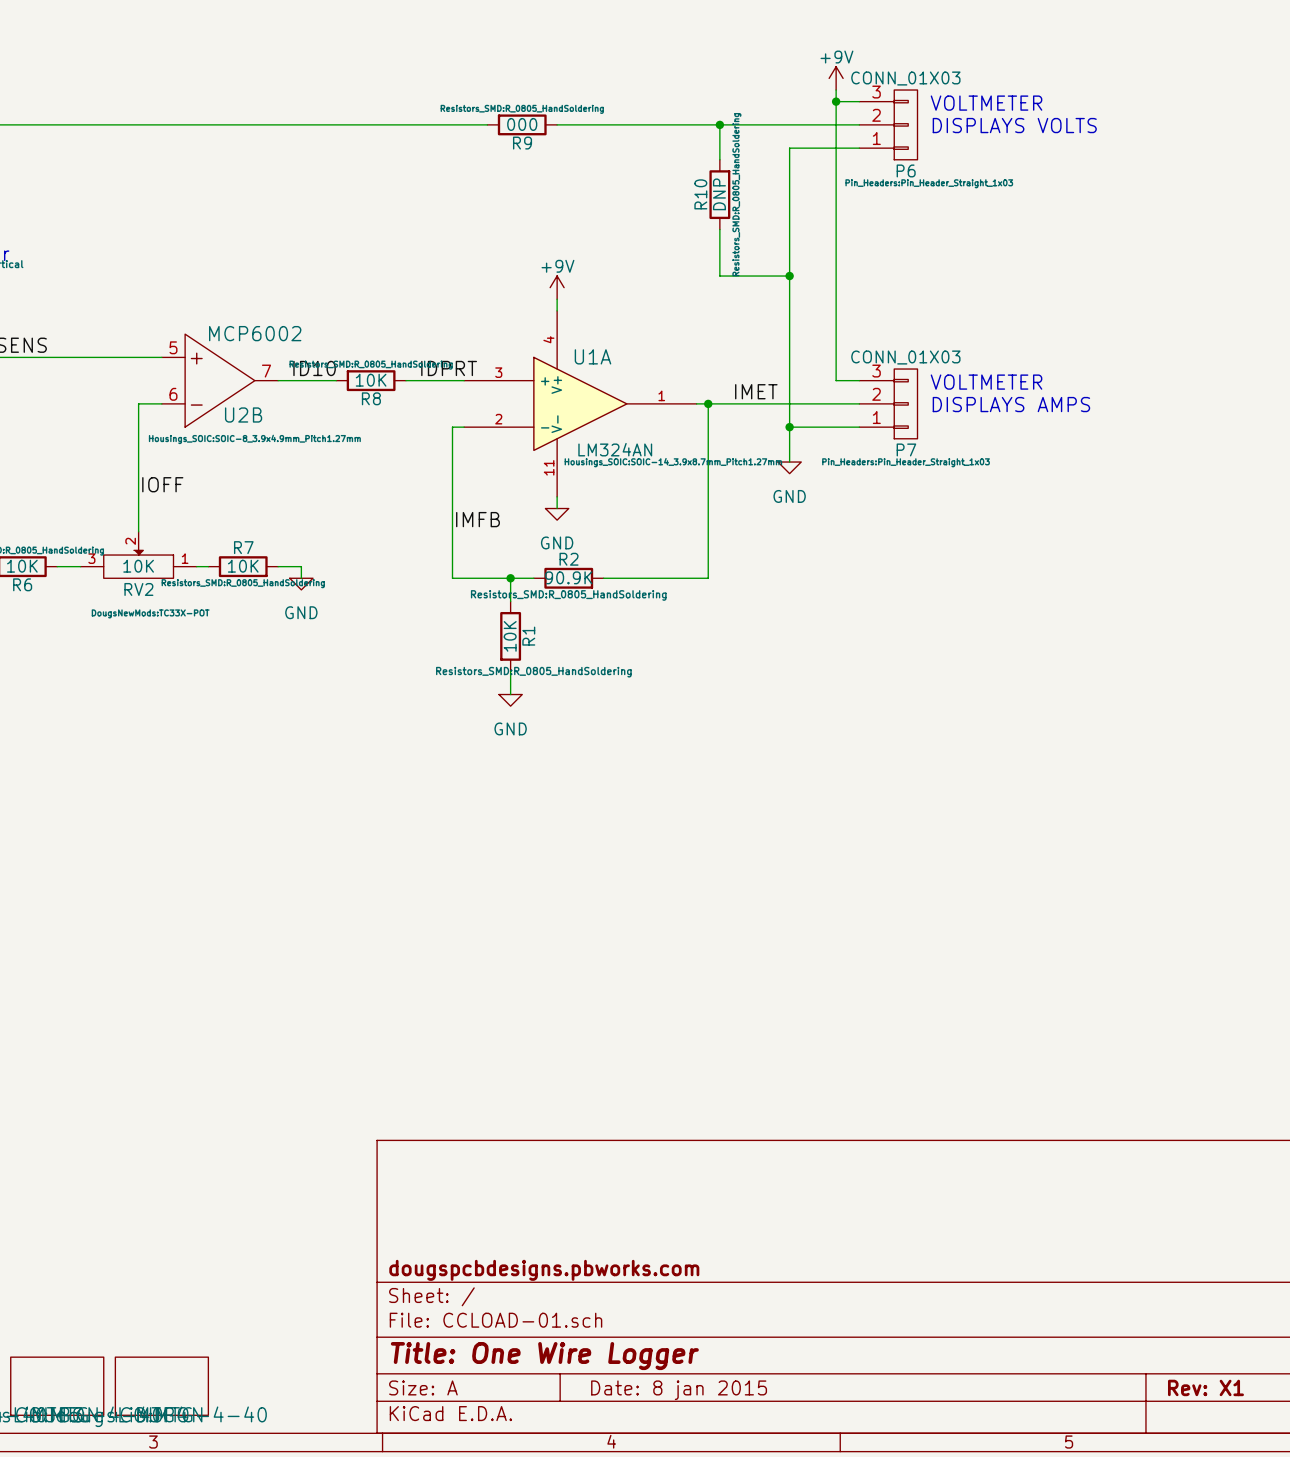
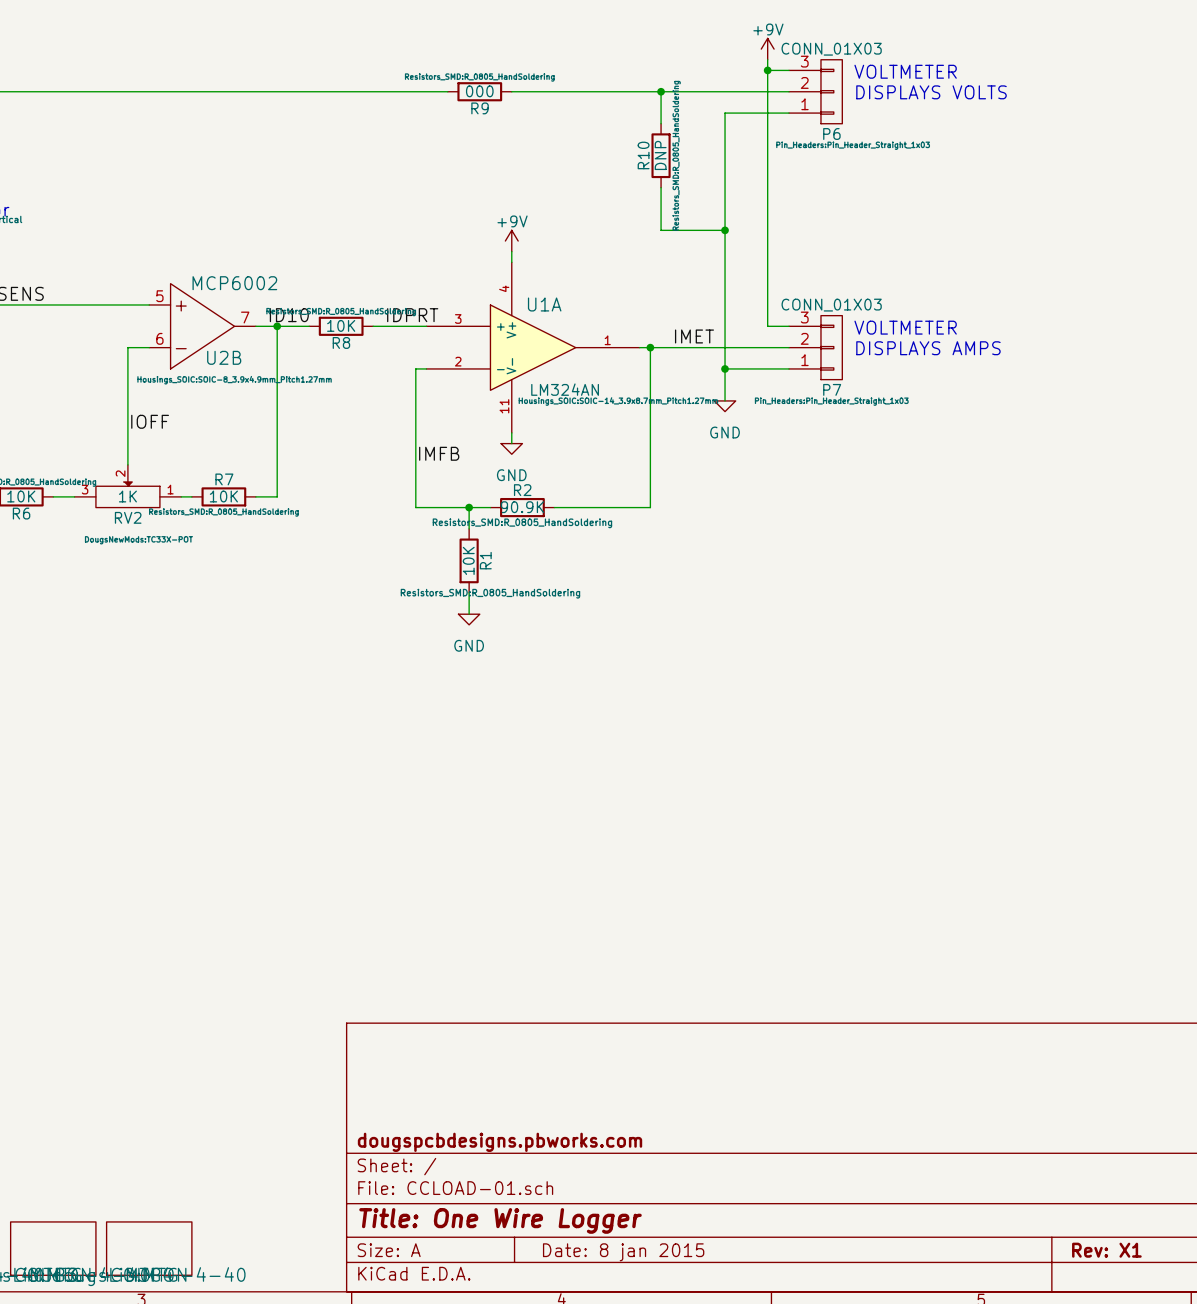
junction: none -> (277, 326)
RV2 value: 10K (138, 566) -> 1K (127, 496)
wire: (301, 566) (301, 578) -> (277, 496) (277, 326)
power symbol: GND (301, 584) -> none

